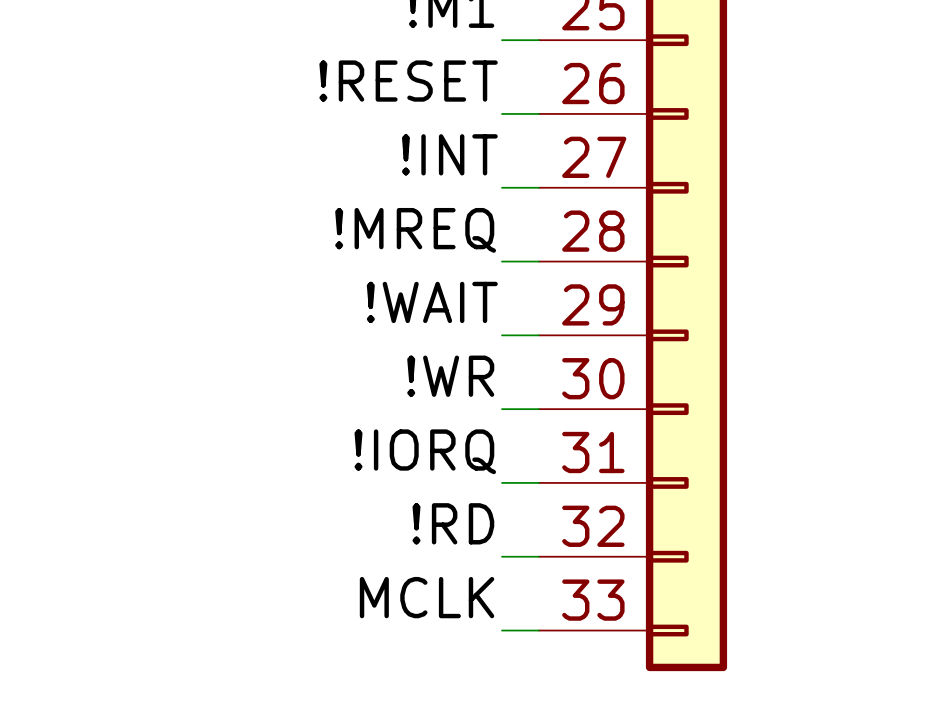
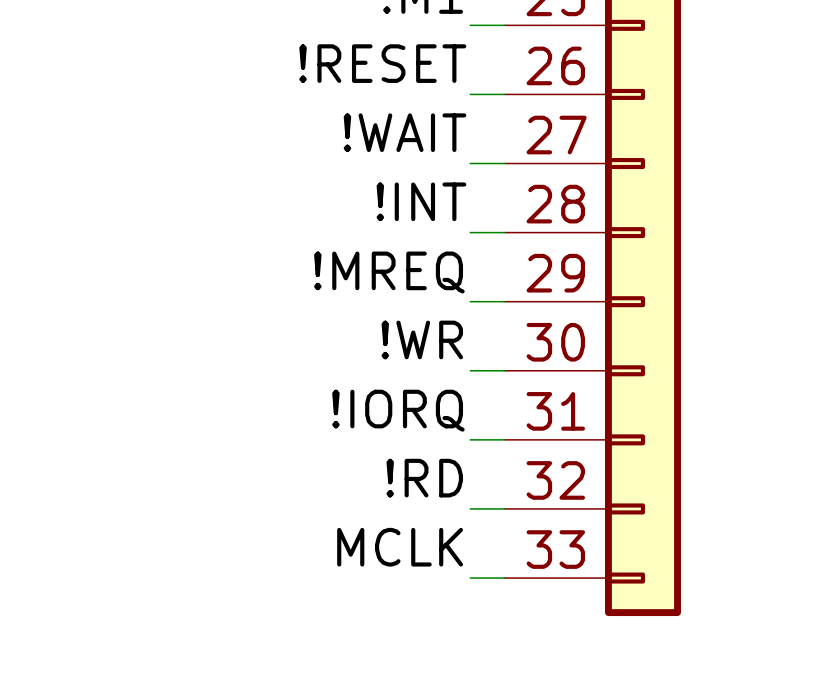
label: !INT (449, 154) -> !WAIT (405, 132)
label: !MREQ (415, 230) -> !INT (421, 201)
label: !WAIT (432, 302) -> !MREQ (389, 272)

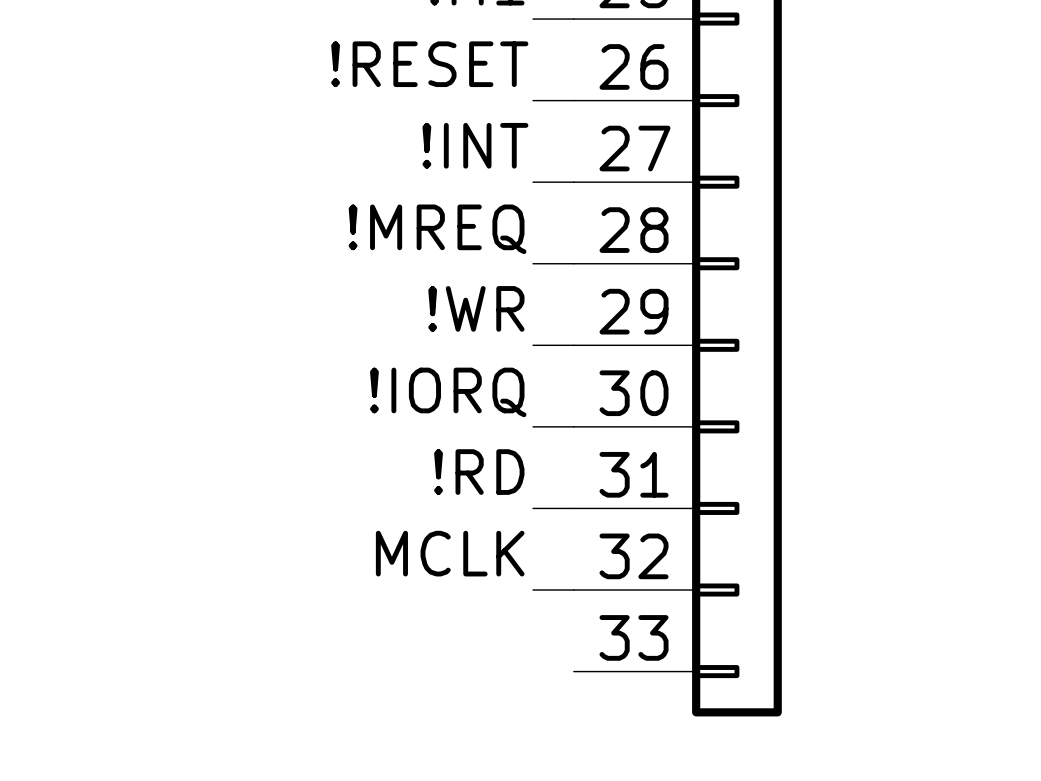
label: !WAIT (405, 132) -> !INT (475, 145)
label: !INT (421, 201) -> !MREQ (437, 229)
label: !MREQ (389, 272) -> !WR (476, 308)
label: !WR (422, 339) -> !IORQ (448, 392)
label: !IORQ (398, 410) -> !RD (479, 472)
label: !RD (424, 478) -> MCLK (450, 553)
label: MCLK (400, 547) -> none
wire: (470, 578) (504, 578) -> none

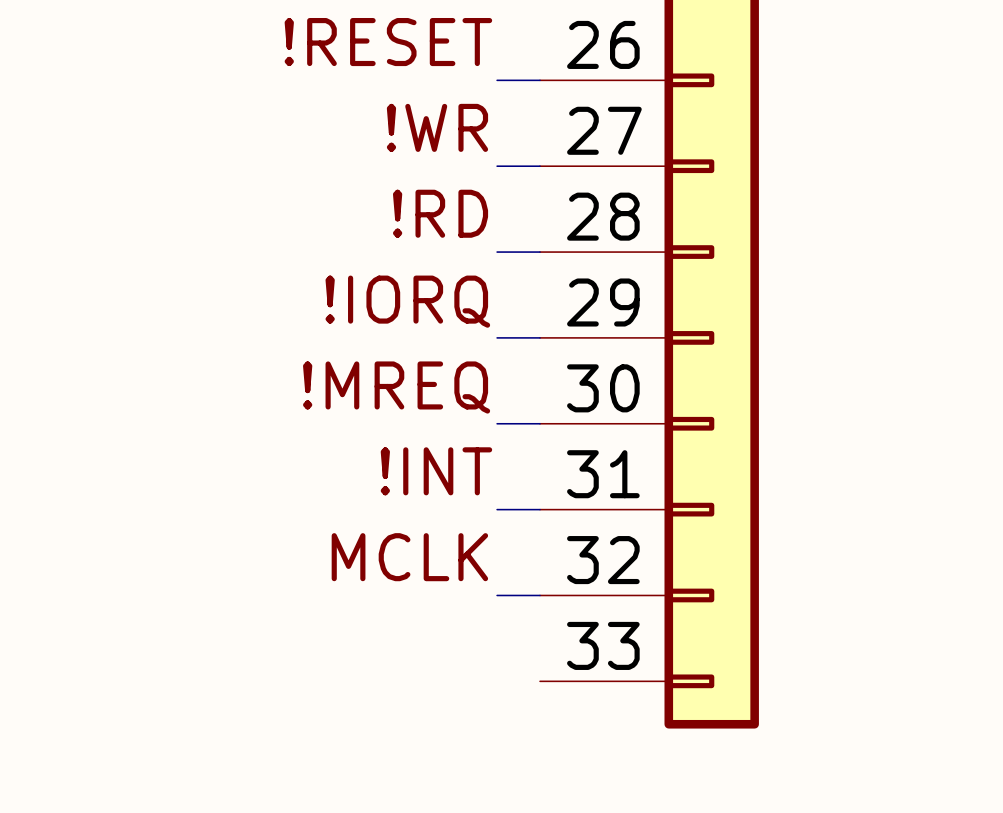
label: !INT (475, 145) -> !WR (437, 127)
label: !MREQ (437, 229) -> !RD (440, 213)
label: !WR (476, 308) -> !IORQ (407, 301)
label: !IORQ (448, 392) -> !MREQ (396, 387)
label: !RD (479, 472) -> !INT (436, 471)

